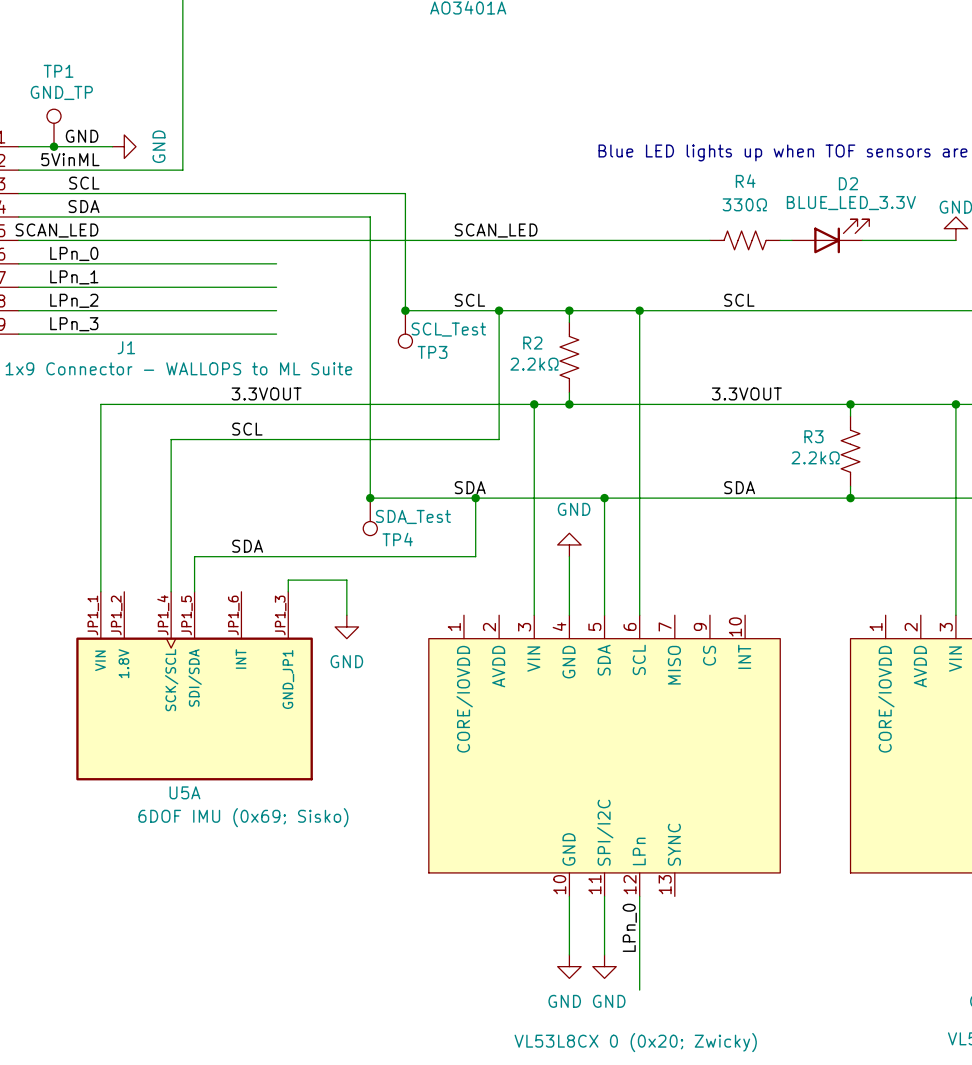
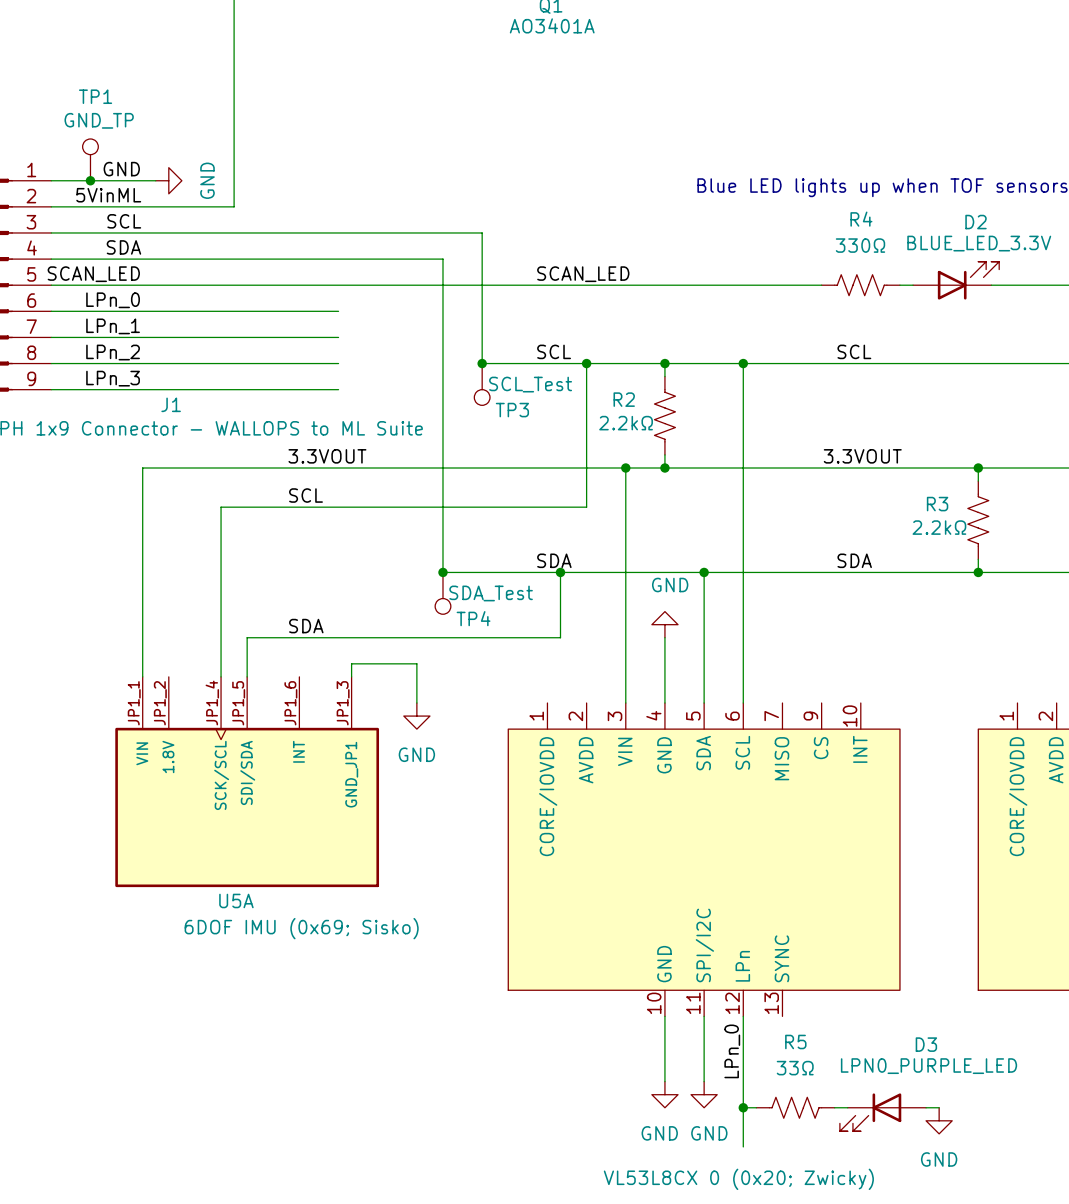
wire: none -> (743, 1107) (756, 1107)
junction: none -> (743, 1107)
R5: none -> 33Ω (795, 1107)
wire: none -> (834, 1107) (847, 1107)
wire: none -> (926, 1107) (939, 1107)
D3: none -> LPN0_PURPLE_LED (882, 1112)
wire: none -> (743, 1120) (743, 1146)
power symbol: none -> GND (939, 1120)

